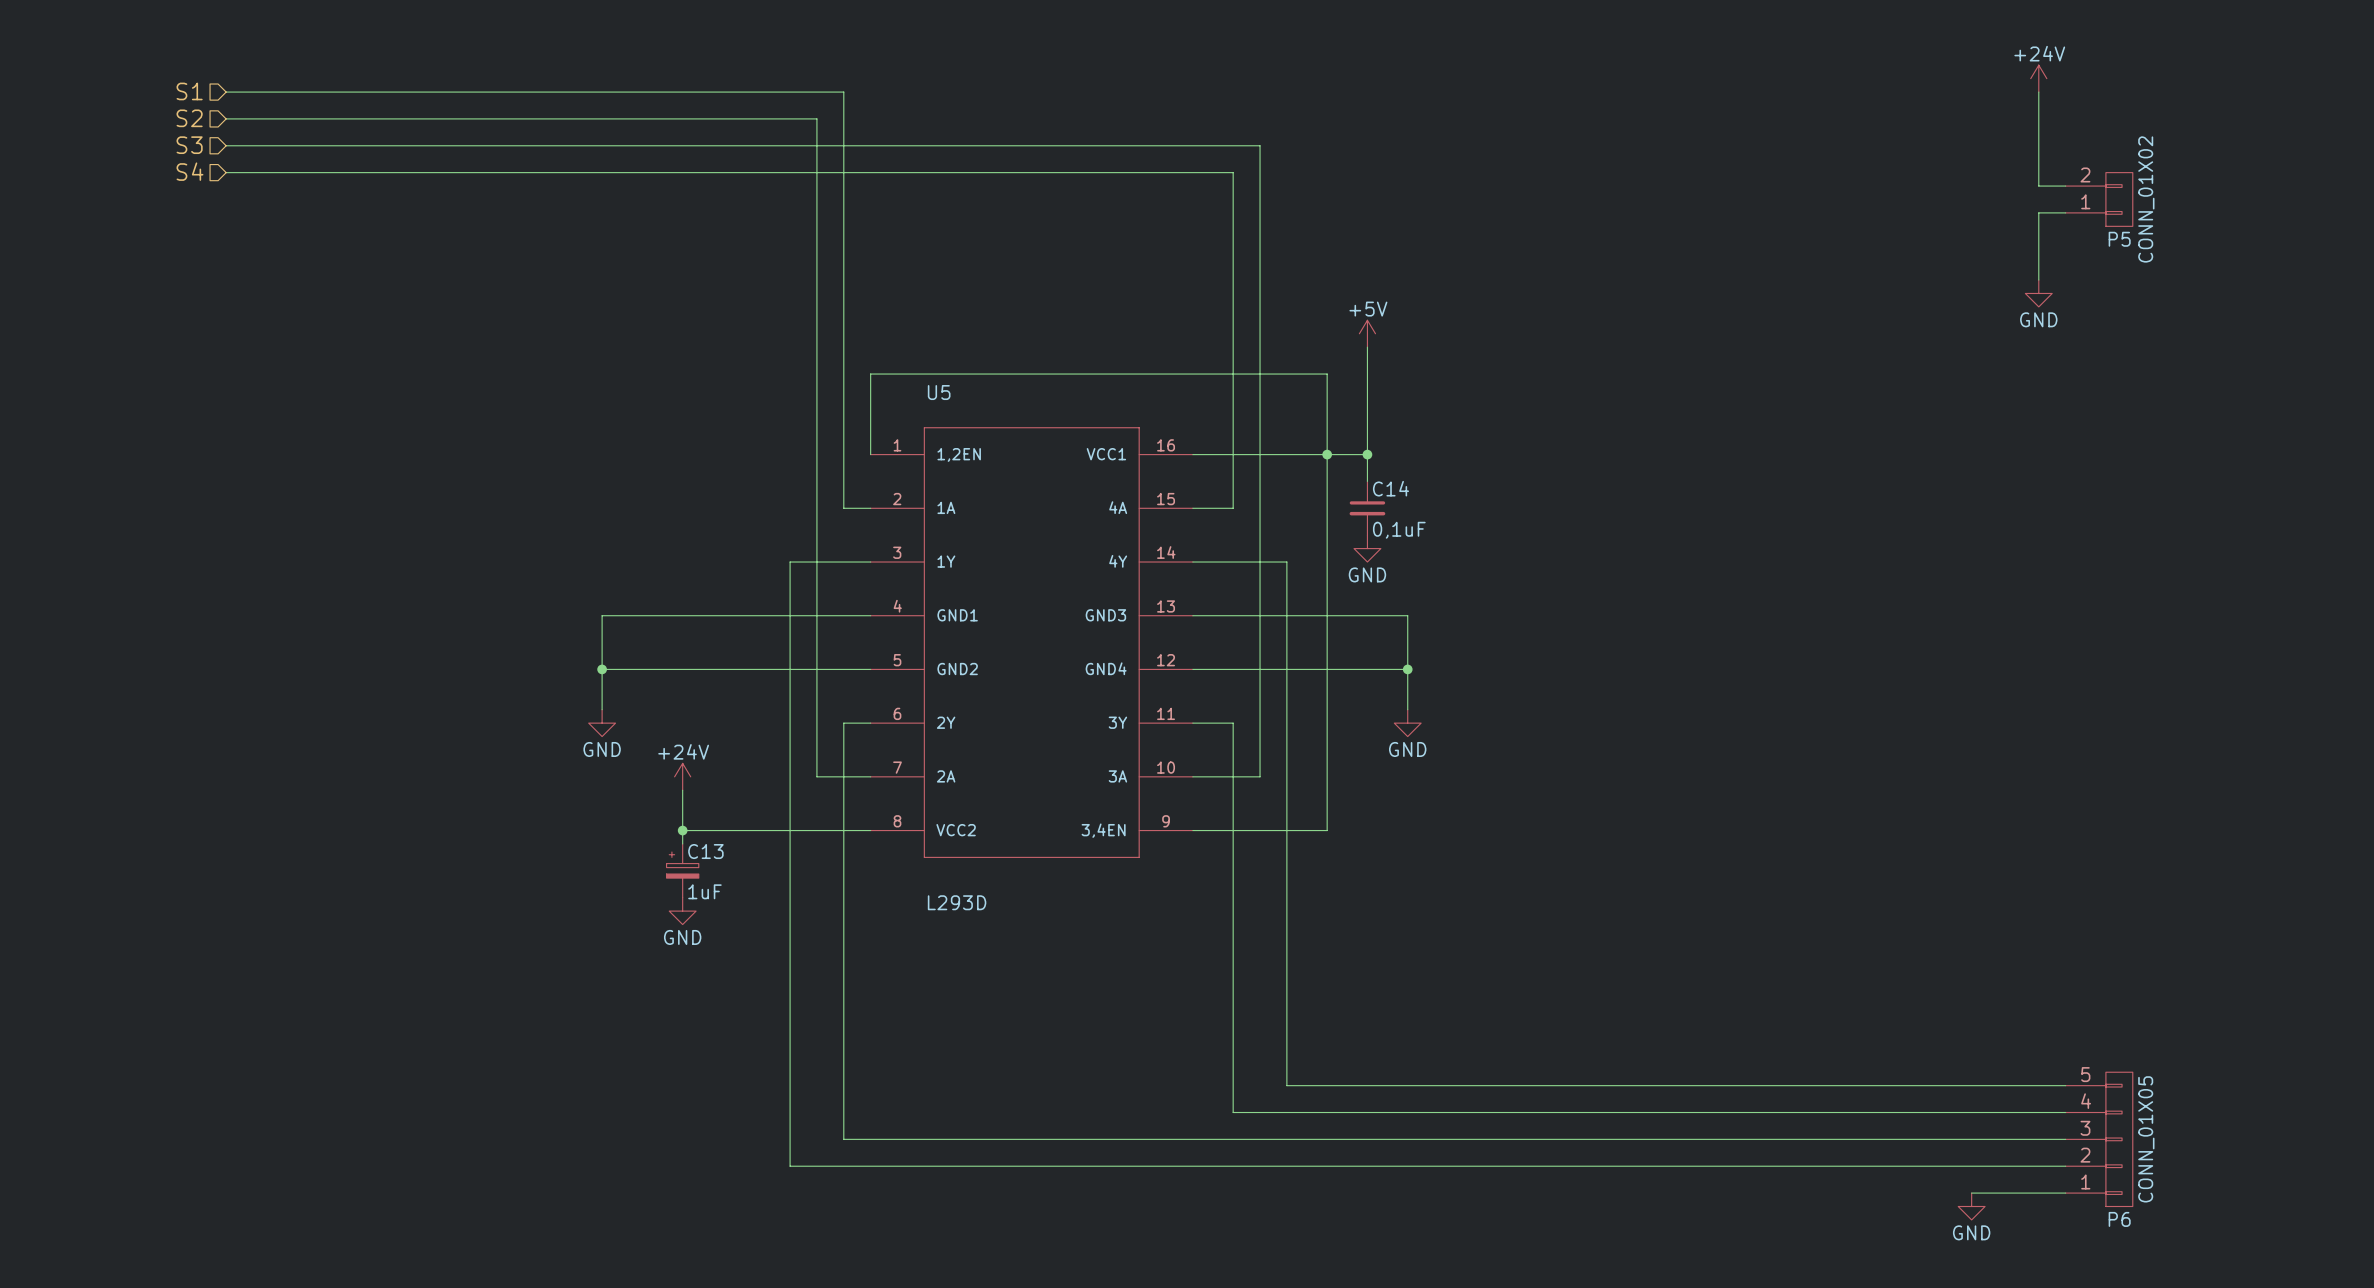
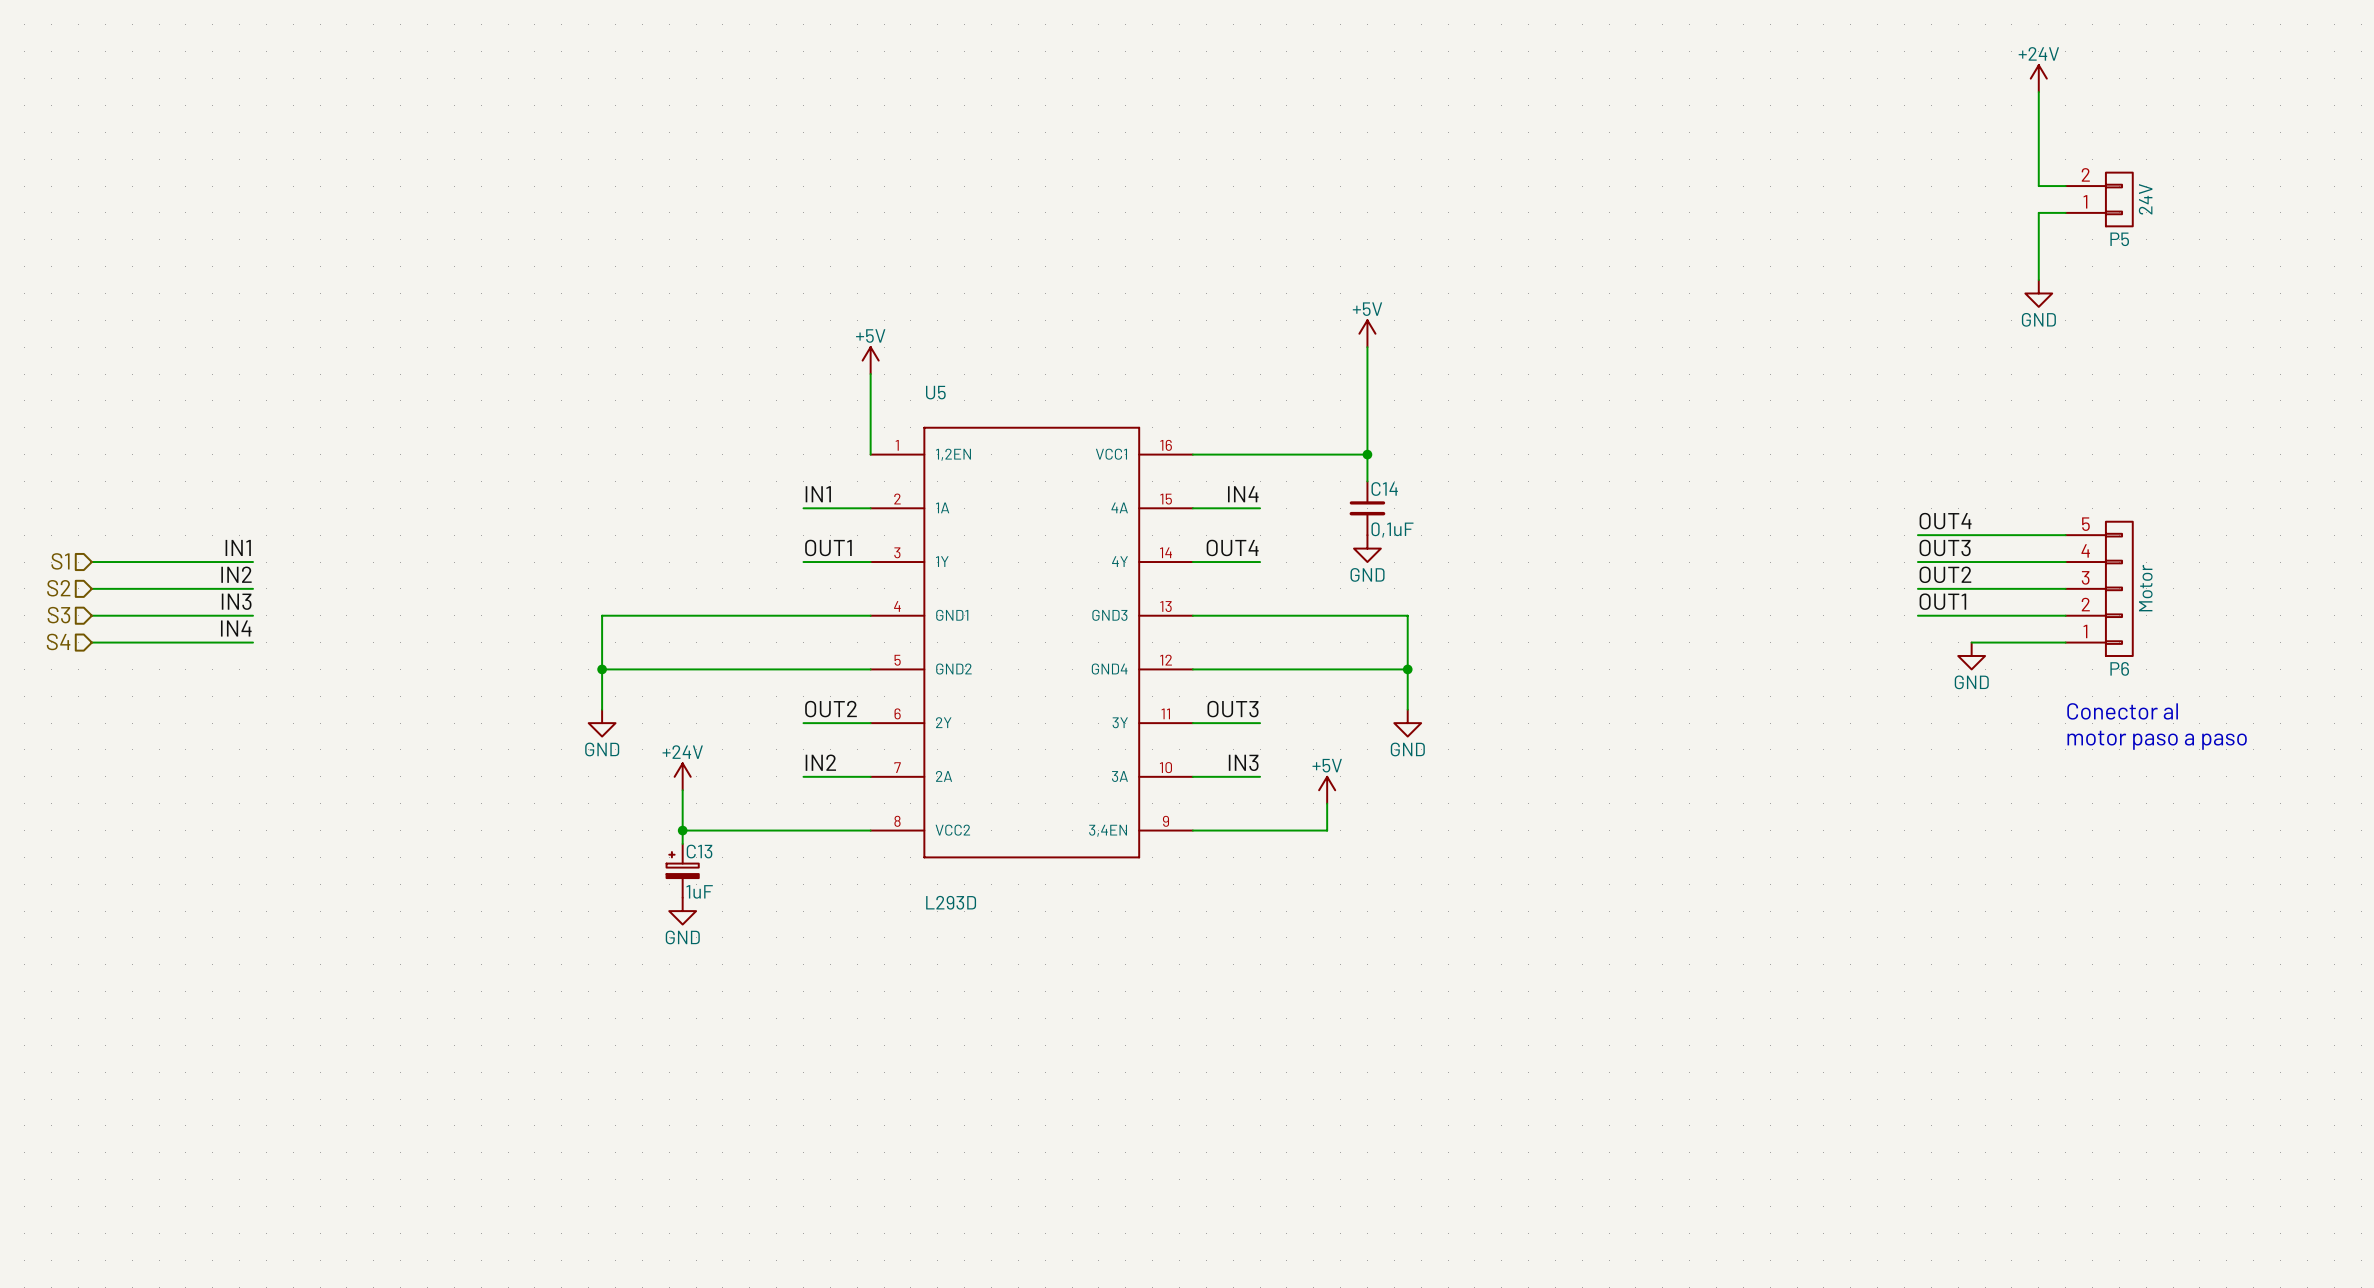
hierarchical label: S1 (189, 91) -> none
wire: (226, 92) (843, 92) (843, 508) -> (803, 508) (843, 508)
hierarchical label: S2 (189, 118) -> none
wire: (226, 118) (816, 118) (816, 776) -> (803, 776) (816, 776)
hierarchical label: S3 (189, 145) -> none
wire: (226, 145) (1260, 145) (1260, 776) -> none
hierarchical label: S4 (189, 171) -> none
wire: (226, 172) (1233, 172) (1233, 508) -> (1260, 508) (1233, 508)
P5 value: CONN_01X02 (2146, 199) -> 24V (2145, 199)
power symbol: none -> +5V (870, 360)
wire: (870, 374) (1327, 374) (1327, 803) -> none
junction: (1327, 454) -> none
label: none -> IN4 (1243, 494)
label: none -> IN1 (818, 494)
label: none -> OUT4 (1945, 521)
wire: none -> (1917, 535) (2065, 535)
label: none -> IN1 (238, 547)
label: none -> OUT1 (828, 547)
label: none -> OUT4 (1232, 547)
label: none -> OUT3 (1945, 547)
hierarchical label: none -> S1 (60, 561)
wire: none -> (91, 562) (253, 562)
wire: (803, 562) (790, 562) (790, 1166) (2065, 1166) -> none
wire: (1260, 562) (1286, 562) (1286, 1085) (2065, 1085) -> none
wire: none -> (1917, 562) (2065, 562)
label: none -> IN2 (236, 574)
label: none -> OUT2 (1945, 574)
hierarchical label: none -> S2 (58, 588)
wire: none -> (91, 588) (253, 588)
wire: none -> (1917, 588) (2065, 588)
label: none -> IN3 (236, 601)
label: none -> OUT1 (1942, 601)
hierarchical label: none -> S3 (58, 615)
wire: none -> (91, 615) (253, 615)
wire: none -> (1917, 615) (2065, 615)
label: none -> IN4 (236, 628)
hierarchical label: none -> S4 (58, 641)
wire: none -> (91, 642) (253, 642)
wire: none -> (1971, 642) (2065, 642)
power symbol: none -> GND (1971, 655)
label: none -> OUT2 (831, 709)
label: none -> OUT3 (1233, 709)
text: none -> Conector al (2122, 711)
wire: (843, 723) (843, 1139) (2065, 1139) -> (843, 723) (803, 723)
wire: (1233, 723) (1233, 1112) (2065, 1112) -> (1233, 723) (1260, 723)
text: none -> motor paso a paso (2157, 740)
label: none -> IN2 (820, 762)
label: none -> IN3 (1243, 762)
power symbol: none -> +5V (1327, 790)
P6 position: (2099, 1139) -> (2099, 588)
P6 value: CONN_01X05 (2146, 1139) -> Motor (2145, 588)
wire: (1971, 1193) (2065, 1193) -> none
power symbol: GND (1971, 1206) -> none

